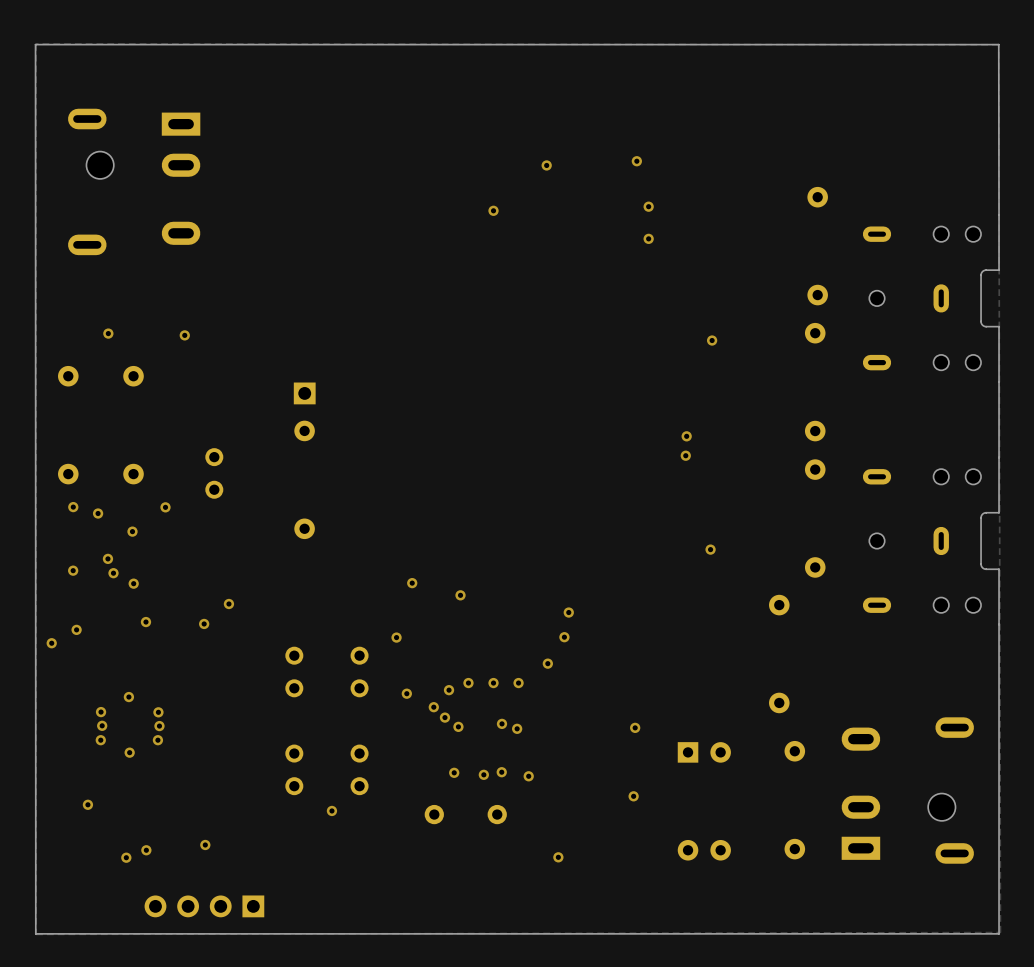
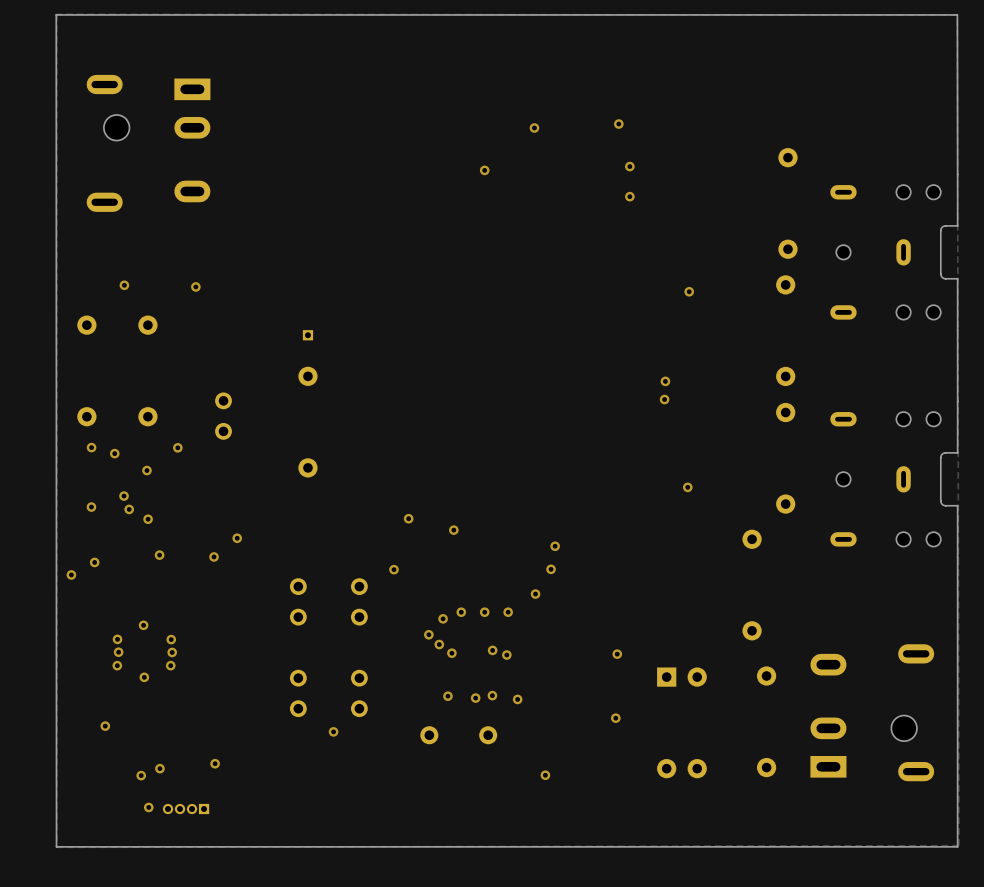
part footprint: [293, 382, 316, 405] -> [302, 330, 314, 341]
via: (406, 693) -> none
via: none -> (148, 807)
part: none -> (186, 809)
part: (204, 906) -> none

